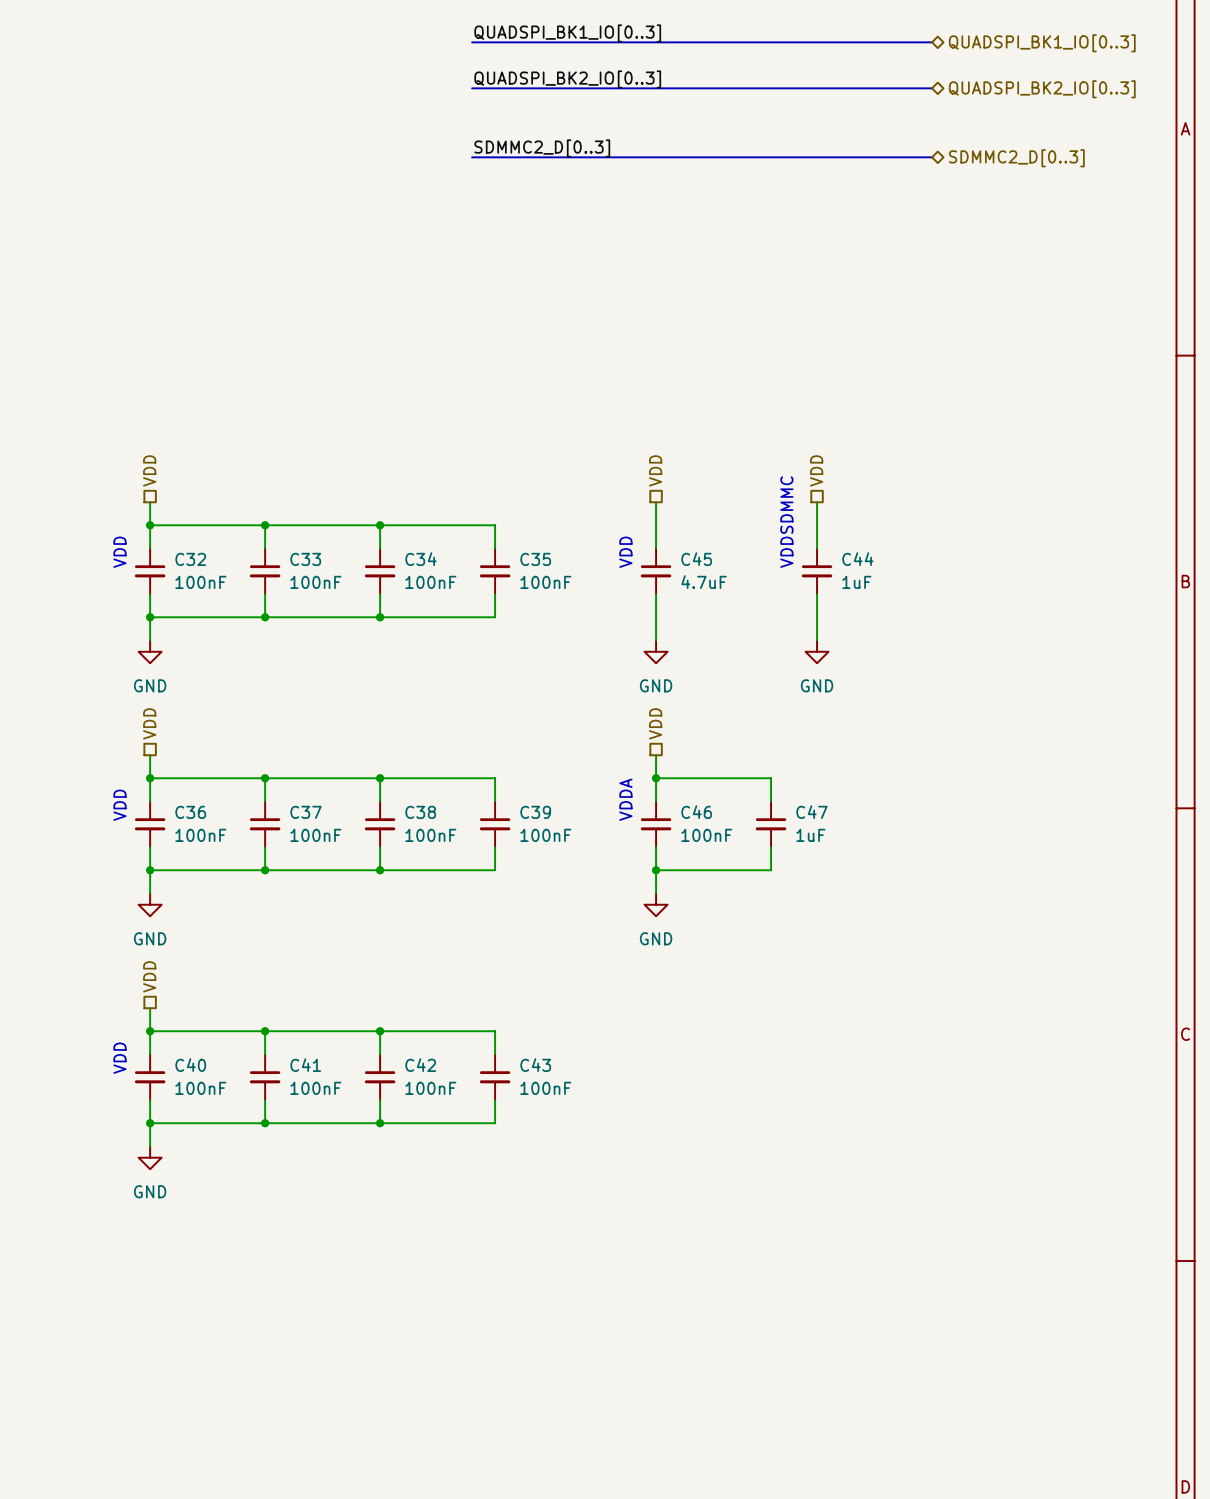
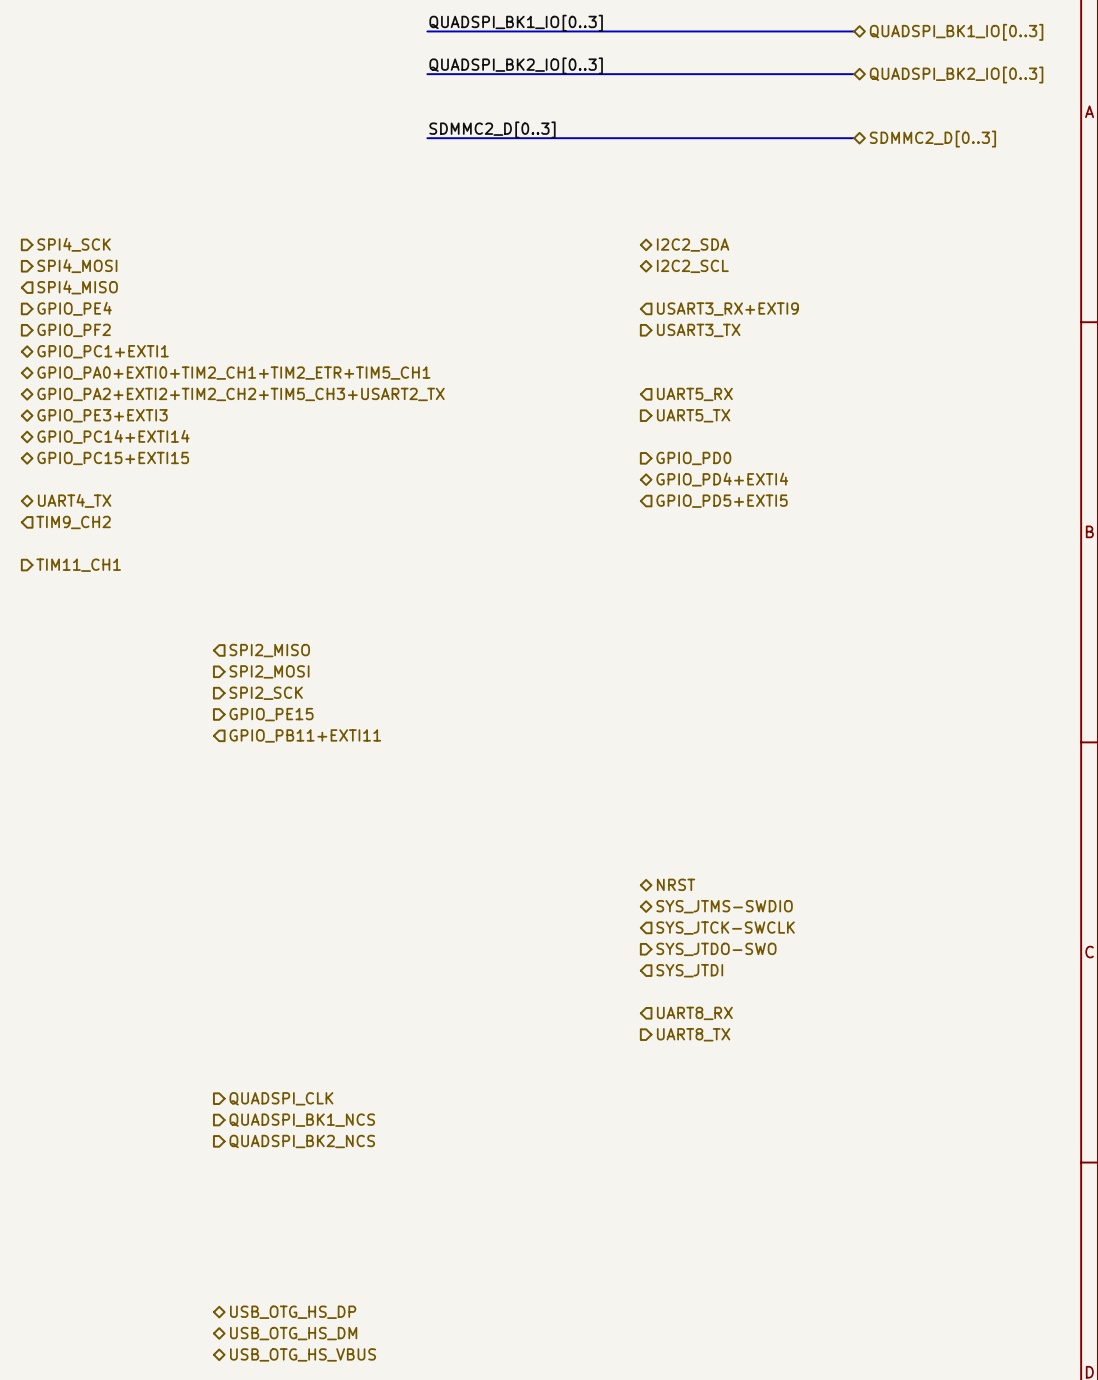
hierarchical label: none -> SPI4_SCK (74, 244)
hierarchical label: none -> I2C2_SDA (693, 245)
hierarchical label: none -> SPI4_MOSI (77, 266)
hierarchical label: none -> I2C2_SCL (692, 266)
hierarchical label: none -> SPI4_MISO (77, 287)
hierarchical label: none -> GPIO_PE4 (74, 308)
hierarchical label: none -> USART3_RX+EXTI9 (727, 309)
hierarchical label: none -> GPIO_PF2 (74, 330)
hierarchical label: none -> USART3_TX (698, 330)
hierarchical label: none -> GPIO_PC1+EXTI1 (103, 351)
hierarchical label: none -> GPIO_PA0+EXTI0+TIM2_CH1+TIM2_ETR+TIM5_CH1 (233, 373)
hierarchical label: none -> GPIO_PA2+EXTI2+TIM2_CH2+TIM5_CH3+USART2_TX (241, 394)
hierarchical label: none -> UART5_RX (694, 394)
hierarchical label: none -> GPIO_PE3+EXTI3 (102, 415)
hierarchical label: none -> UART5_TX (693, 415)
hierarchical label: VDD (149, 470) -> none
hierarchical label: VDD (655, 470) -> none
hierarchical label: VDD (816, 470) -> none
hierarchical label: none -> GPIO_PC14+EXTI14 (113, 436)
hierarchical label: none -> GPIO_PC15+EXTI15 (113, 458)
wire: (150, 502) (150, 548) -> none
wire: (656, 502) (656, 548) -> none
hierarchical label: none -> GPIO_PD0 (693, 458)
wire: (817, 502) (817, 548) -> none
text: VDDSDMMC (786, 522) -> none
wire: (150, 525) (495, 525) (495, 548) -> none
junction: (150, 525) -> none
wire: (265, 525) (265, 548) -> none
junction: (265, 525) -> none
wire: (380, 525) (380, 548) -> none
junction: (380, 525) -> none
hierarchical label: none -> GPIO_PD4+EXTI4 (722, 479)
hierarchical label: none -> UART4_TX (74, 500)
hierarchical label: none -> GPIO_PD5+EXTI5 (722, 501)
text: VDD (119, 552) -> none
text: VDD (625, 552) -> none
hierarchical label: none -> TIM9_CH2 (73, 522)
C32: 100nF (150, 571) -> none
C33: 100nF (265, 571) -> none
C34: 100nF (380, 571) -> none
C35: 100nF (495, 571) -> none
C45: 4.7uF (656, 571) -> none
C44: 1uF (817, 571) -> none
wire: (150, 594) (150, 640) -> none
wire: (265, 594) (265, 617) -> none
wire: (380, 594) (380, 617) -> none
wire: (495, 594) (495, 617) (150, 617) -> none
wire: (656, 594) (656, 640) -> none
wire: (817, 594) (817, 640) -> none
hierarchical label: none -> TIM11_CH1 (78, 565)
junction: (150, 617) -> none
junction: (265, 617) -> none
junction: (380, 617) -> none
power symbol: GND (150, 651) -> none
power symbol: GND (656, 651) -> none
power symbol: GND (817, 651) -> none
hierarchical label: none -> SPI2_MISO (269, 650)
hierarchical label: VDD (149, 723) -> none
hierarchical label: VDD (655, 723) -> none
hierarchical label: none -> SPI2_MOSI (269, 671)
wire: (150, 755) (150, 801) -> none
hierarchical label: none -> SPI2_SCK (266, 693)
wire: (656, 755) (656, 801) -> none
wire: (150, 778) (495, 778) (495, 801) -> none
junction: (150, 778) -> none
wire: (265, 778) (265, 801) -> none
junction: (265, 778) -> none
hierarchical label: none -> GPIO_PE15 (271, 714)
wire: (380, 778) (380, 801) -> none
junction: (380, 778) -> none
wire: (656, 778) (771, 778) (771, 801) -> none
junction: (656, 778) -> none
text: VDDA (625, 799) -> none
hierarchical label: none -> GPIO_PB11+EXTI11 (305, 735)
text: VDD (119, 805) -> none
C36: 100nF (150, 824) -> none
C37: 100nF (265, 824) -> none
C38: 100nF (380, 824) -> none
C39: 100nF (495, 824) -> none
C46: 100nF (656, 824) -> none
C47: 1uF (771, 824) -> none
wire: (150, 847) (150, 893) -> none
wire: (265, 847) (265, 870) -> none
wire: (380, 847) (380, 870) -> none
wire: (495, 847) (495, 870) (150, 870) -> none
wire: (656, 847) (656, 893) -> none
wire: (771, 847) (771, 870) (656, 870) -> none
junction: (150, 870) -> none
junction: (265, 870) -> none
junction: (380, 870) -> none
junction: (656, 870) -> none
power symbol: GND (150, 904) -> none
power symbol: GND (656, 904) -> none
hierarchical label: none -> NRST (676, 884)
hierarchical label: VDD (149, 976) -> none
hierarchical label: none -> SYS_JTMS-SWDIO (724, 906)
wire: (150, 1008) (150, 1054) -> none
hierarchical label: none -> SYS_JTCK-SWCLK (725, 928)
wire: (150, 1031) (495, 1031) (495, 1054) -> none
junction: (150, 1031) -> none
wire: (265, 1031) (265, 1054) -> none
junction: (265, 1031) -> none
wire: (380, 1031) (380, 1054) -> none
junction: (380, 1031) -> none
hierarchical label: none -> SYS_JTDO-SWO (716, 949)
hierarchical label: none -> SYS_JTDI (689, 970)
text: VDD (119, 1058) -> none
C40: 100nF (150, 1077) -> none
C41: 100nF (265, 1077) -> none
C42: 100nF (380, 1077) -> none
C43: 100nF (495, 1077) -> none
wire: (150, 1100) (150, 1146) -> none
wire: (265, 1100) (265, 1123) -> none
wire: (380, 1100) (380, 1123) -> none
wire: (495, 1100) (495, 1123) (150, 1123) -> none
hierarchical label: none -> UART8_RX (694, 1013)
junction: (150, 1123) -> none
junction: (265, 1123) -> none
junction: (380, 1123) -> none
hierarchical label: none -> UART8_TX (693, 1034)
power symbol: GND (150, 1157) -> none
hierarchical label: none -> QUADSPI_CLK (281, 1098)
hierarchical label: none -> QUADSPI_BK1_NCS (302, 1120)
hierarchical label: none -> QUADSPI_BK2_NCS (302, 1141)
hierarchical label: none -> USB_OTG_HS_DP (293, 1312)
hierarchical label: none -> USB_OTG_HS_DM (293, 1333)
hierarchical label: none -> USB_OTG_HS_VBUS (303, 1354)

